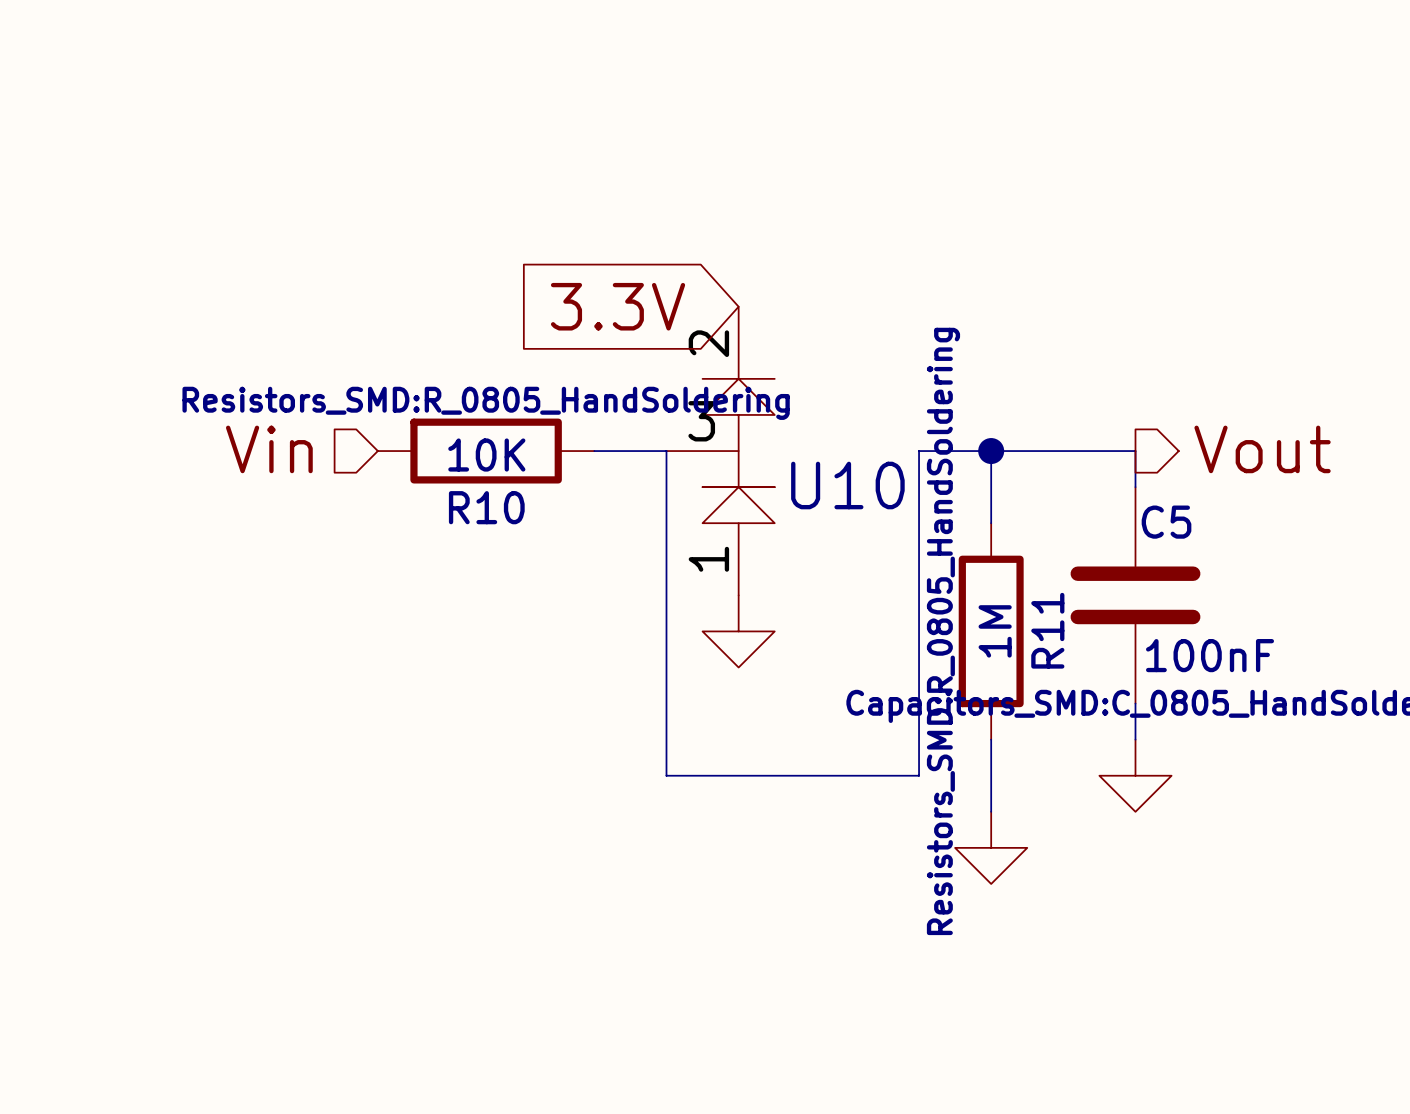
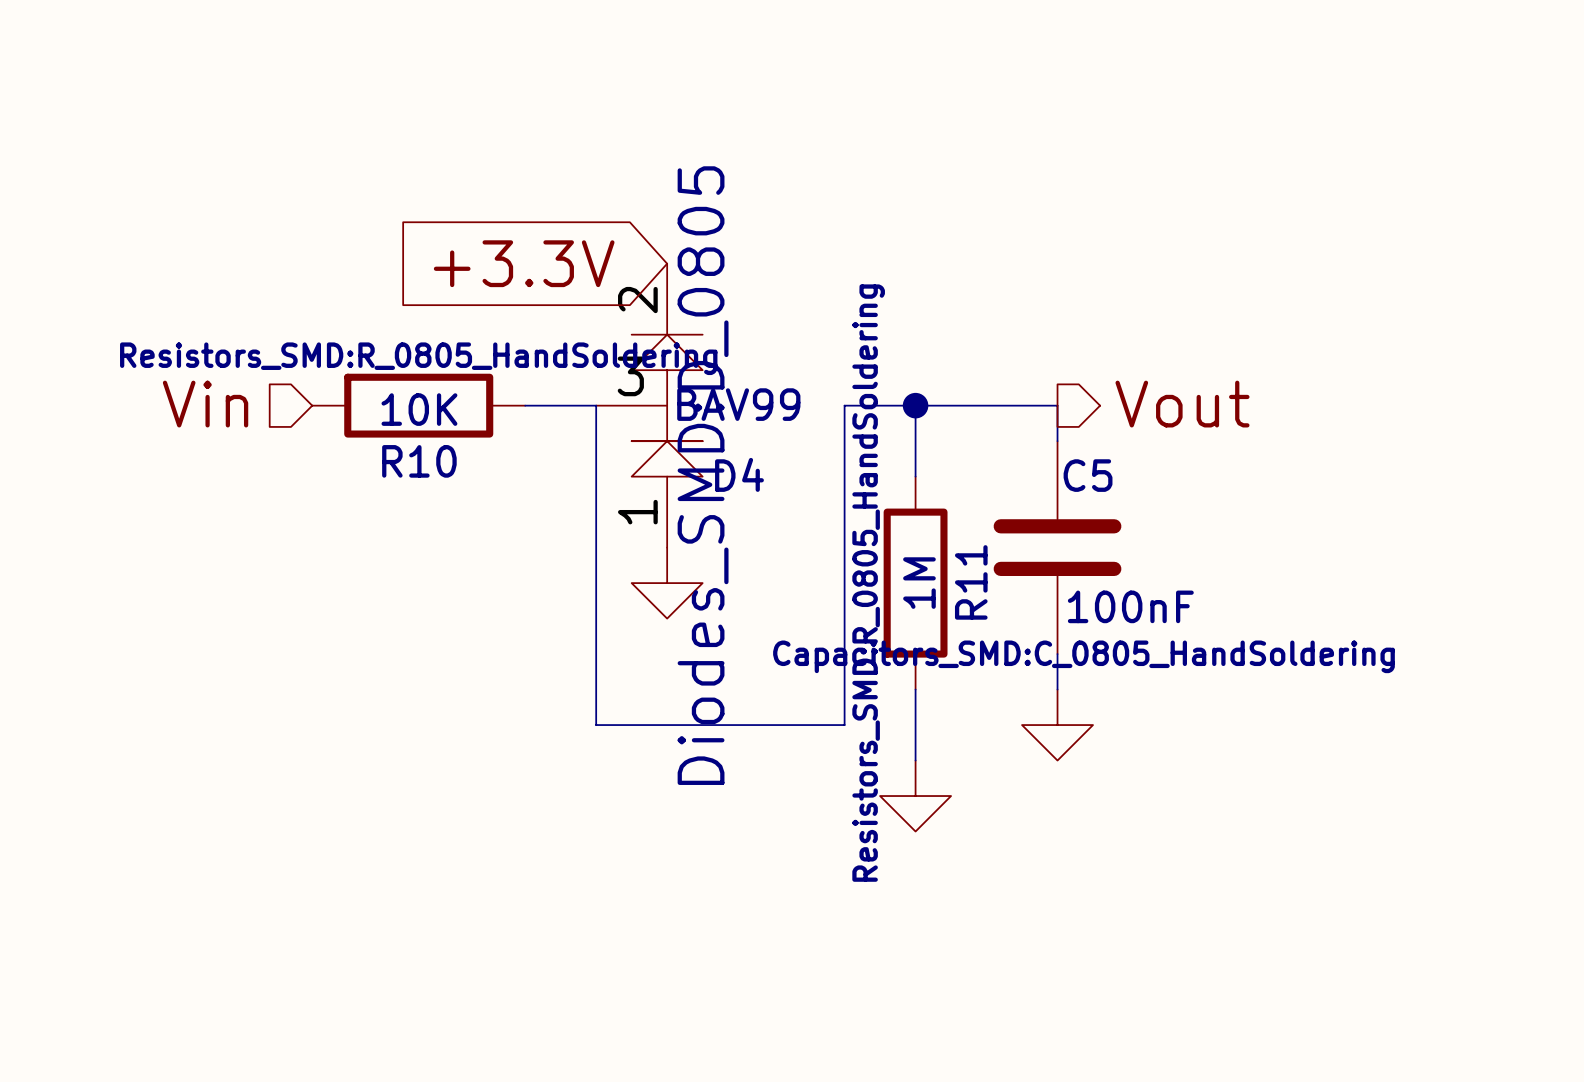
global label: 3.3V (618, 306) -> +3.3V (524, 263)
U10 value: none -> BAV99 (738, 404)
U10 name: U10 (847, 485) -> D4 (739, 474)
U10 text: none -> Diodes_SMD:D_0805 (703, 475)

